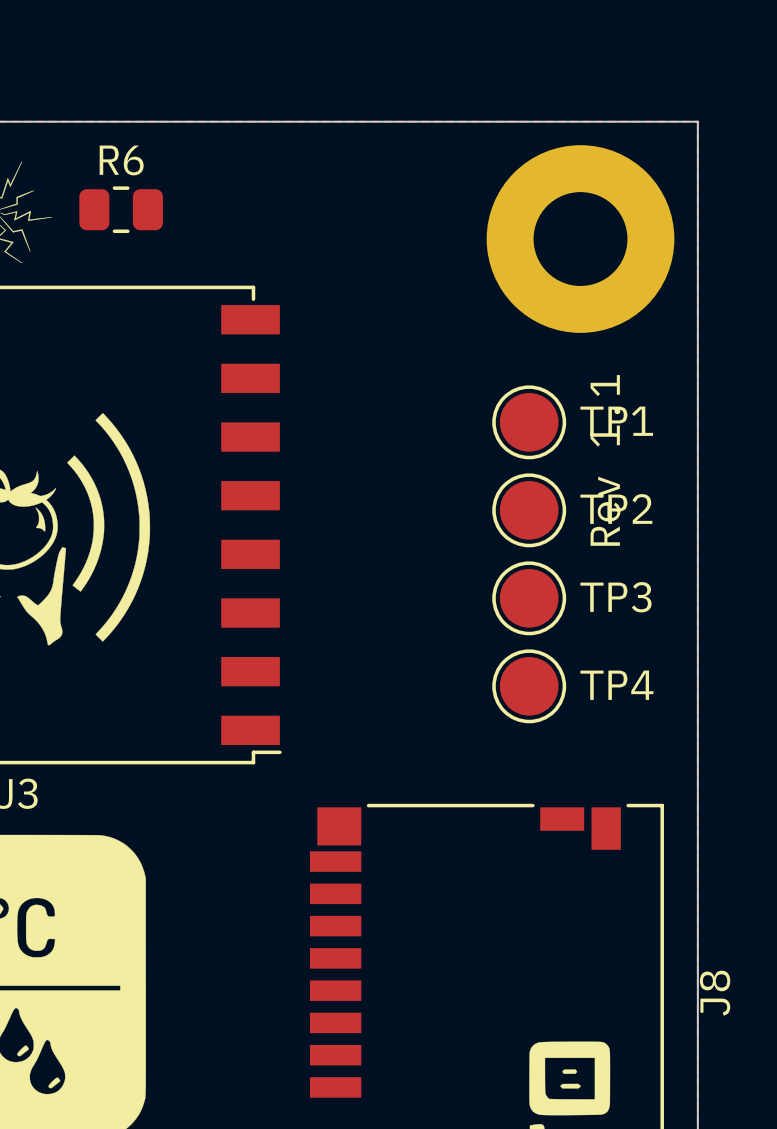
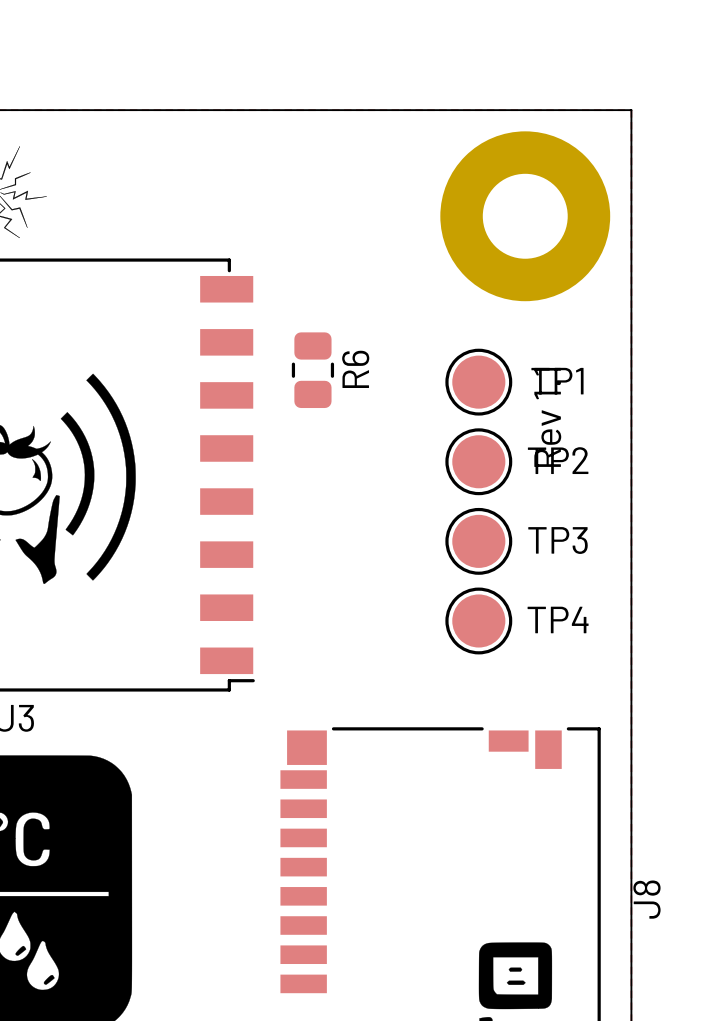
R6 rotation: 0° (121, 209) -> 90° clockwise (312, 370)
R6 position: (121, 209) -> (312, 370)

